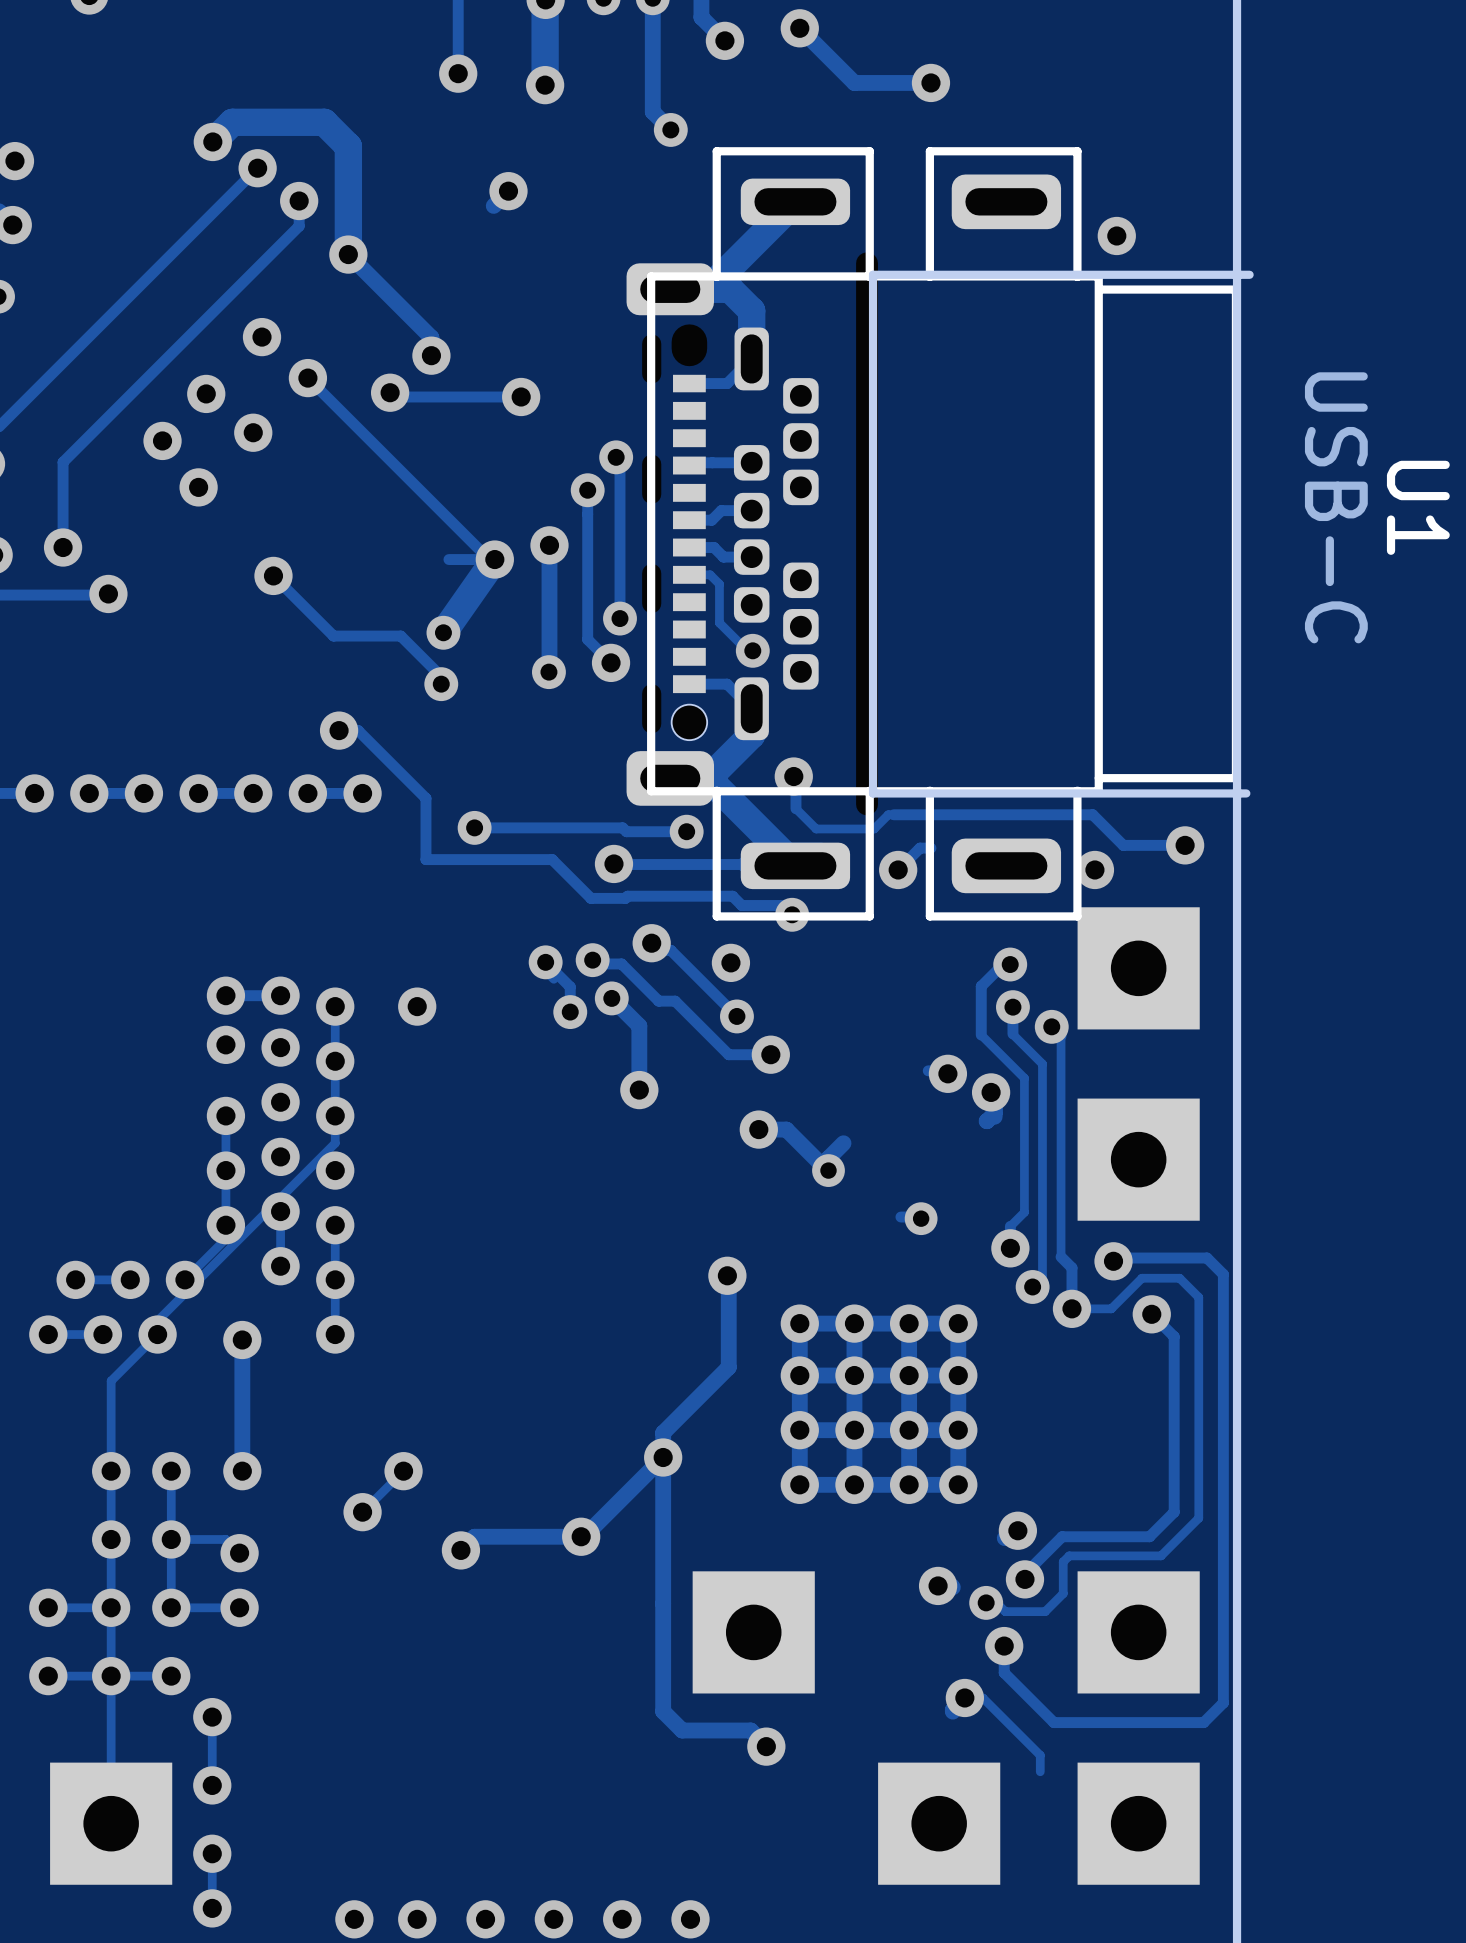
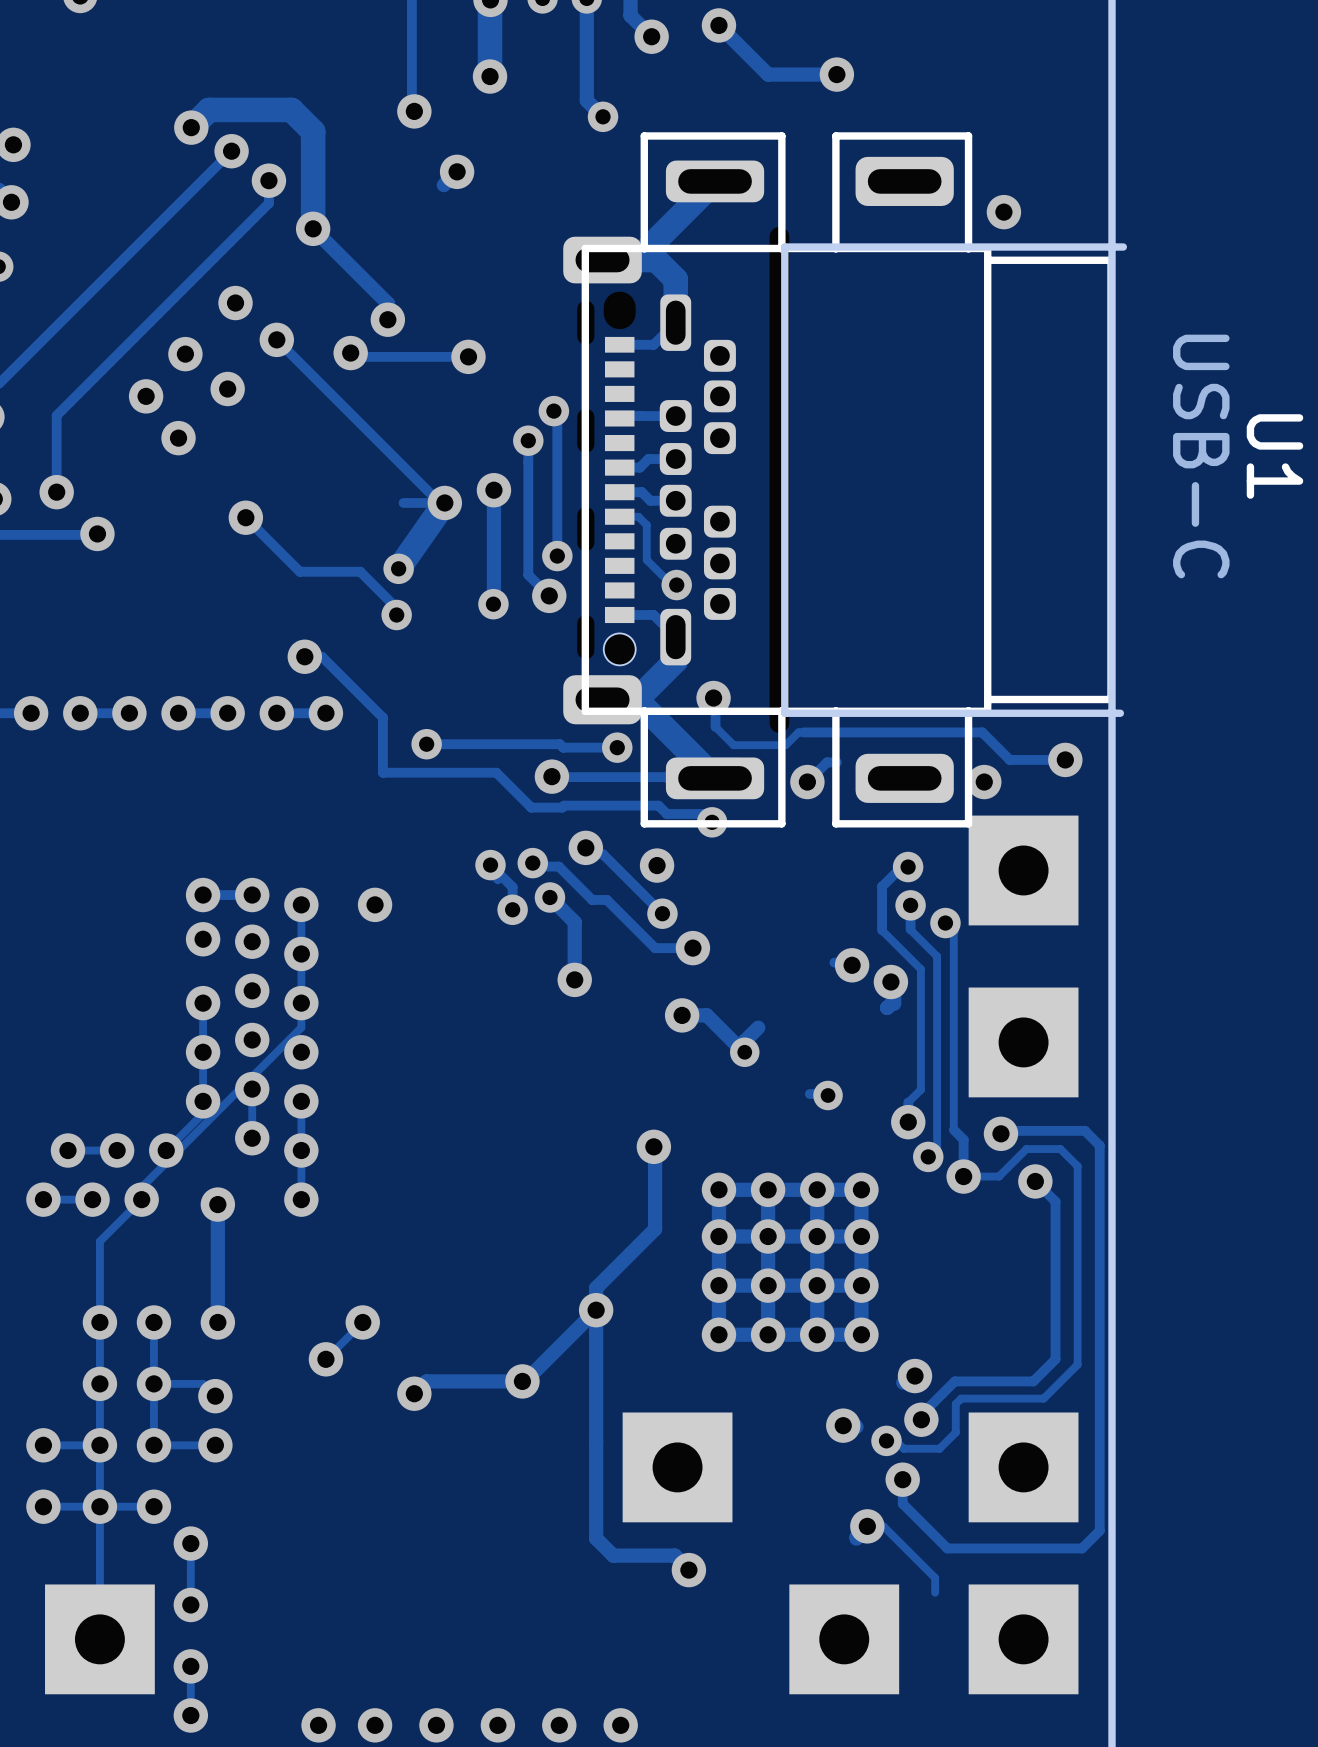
track: none -> (411, 66) (411, 108) (414, 111)
via position: (458, 73) -> (414, 111)

